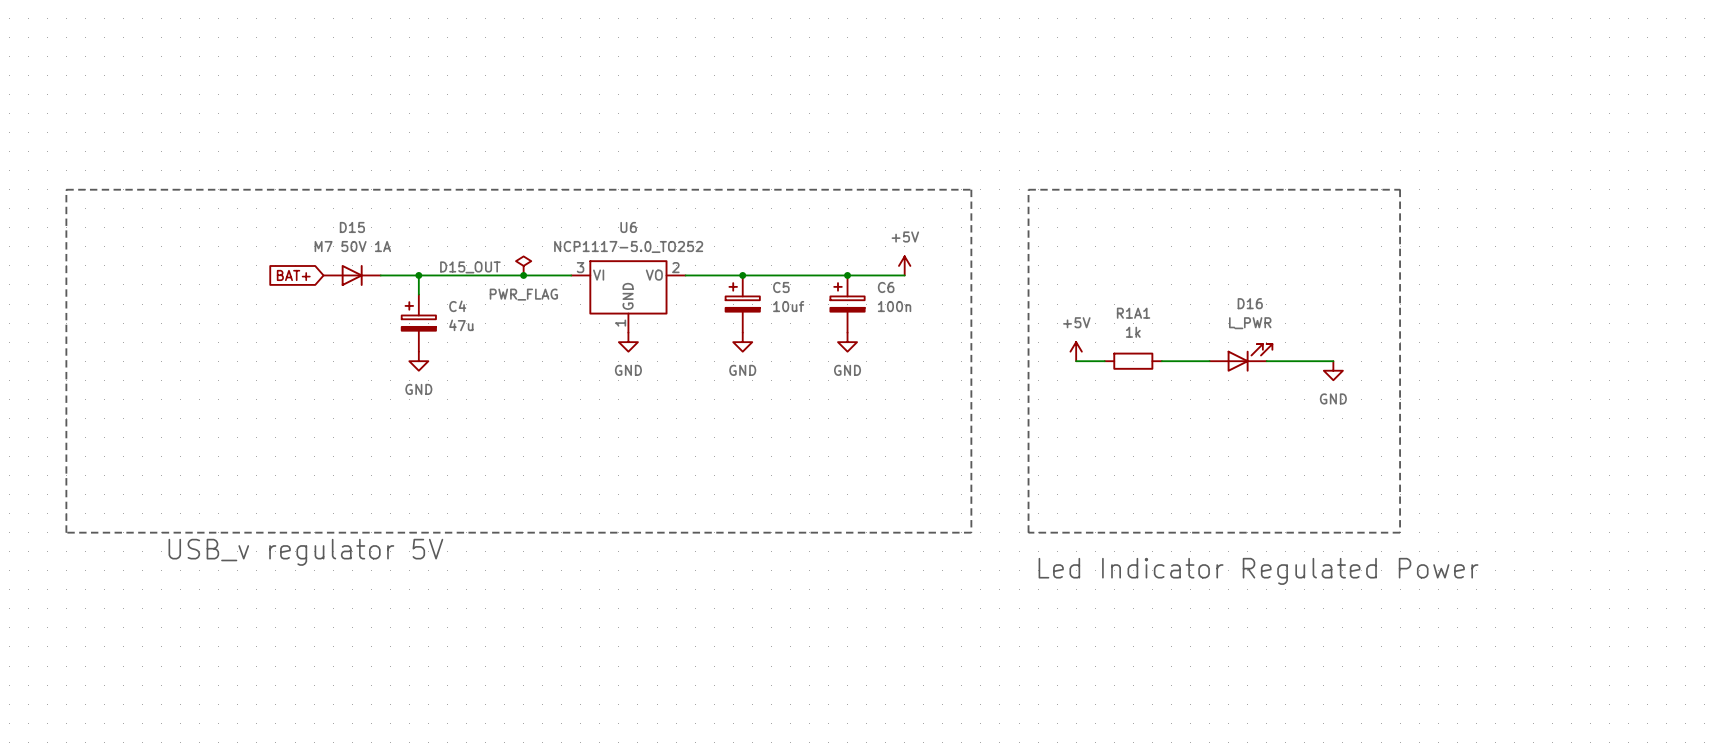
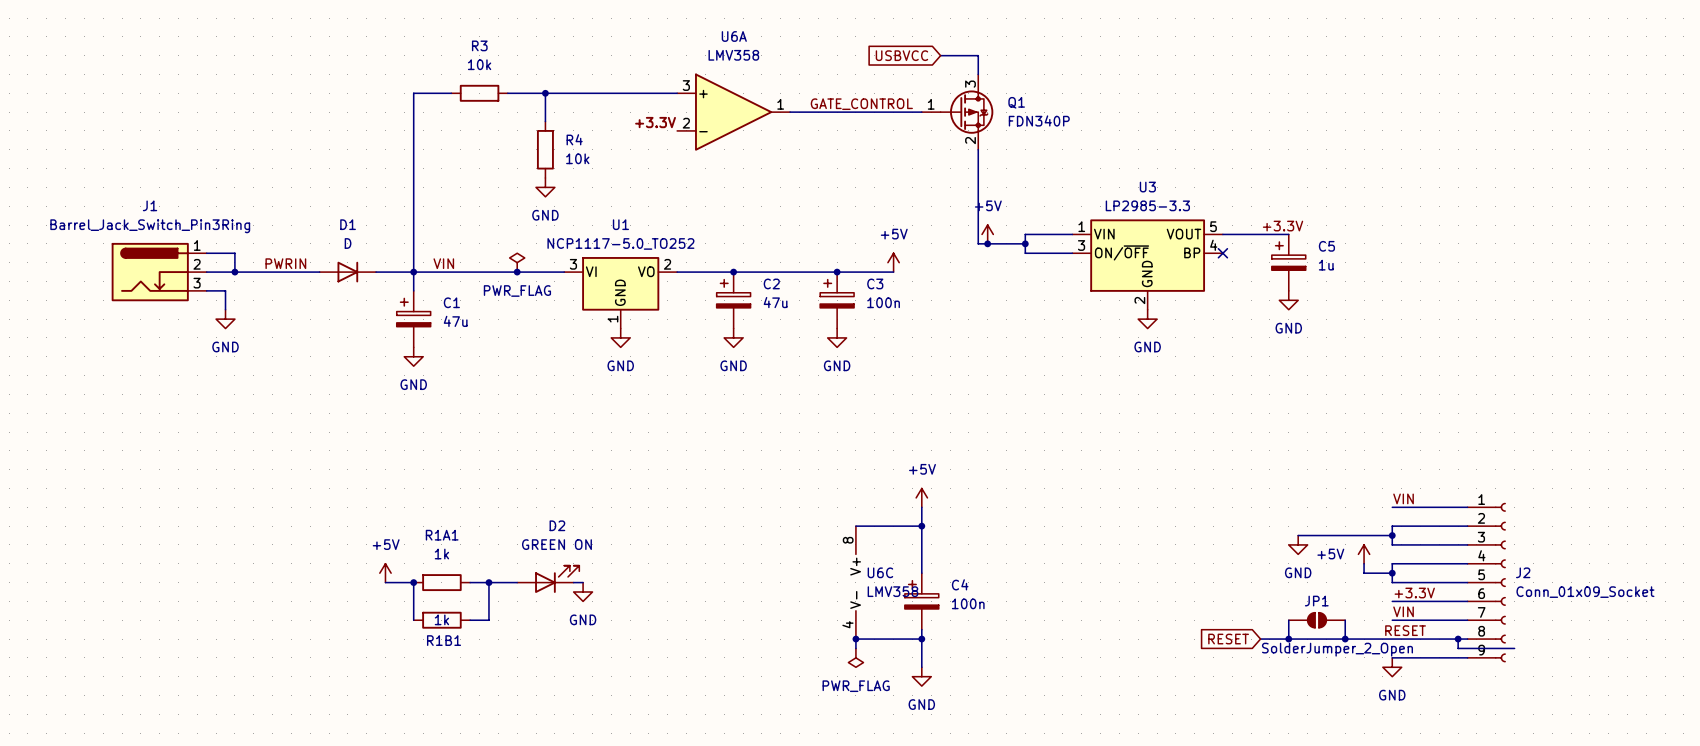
global label: none -> USBVCC (901, 55)
wire: none -> (940, 55) (978, 55) (978, 74)
wire: none -> (451, 93) (413, 93) (413, 272)
R3: none -> 10k (479, 93)
wire: none -> (507, 93) (677, 93)
wire: none -> (545, 93) (545, 121)
junction: none -> (545, 93)
label: none -> GATE_CONTROL (861, 104)
U6A: none -> LMV358 (733, 112)
wire: none -> (790, 112) (921, 112)
Q1: none -> FDN340P (957, 112)
label: none -> +3.3V (655, 122)
R4: none -> 10k (545, 149)
wire: none -> (978, 149) (978, 243) (1025, 243)
line: (66, 189) (971, 189) (971, 532) (66, 532) (66, 189) -> none
power symbol: none -> GND (545, 187)
line: (1028, 189) (1400, 189) (1400, 532) (1028, 532) (1028, 189) -> none
D15 name: D15 (352, 227) -> D1 (348, 224)
U6 name: U6 (628, 227) -> U1 (620, 224)
label: none -> +3.3V (1283, 226)
power symbol: none -> +5V (987, 234)
wire: none -> (1072, 234) (1025, 234) (1025, 253) (1072, 253)
D15 value: M7 50V 1A (352, 246) -> D (348, 243)
junction: none -> (987, 243)
junction: none -> (1025, 243)
wire: none -> (206, 253) (234, 253) (234, 272)
no-connect mark: none -> (1222, 253)
C5: none -> 1u (1288, 262)
label: none -> PWRIN (285, 263)
label: D15_OUT (470, 267) -> VIN (443, 263)
U3: none -> LP2985-3.3 (1147, 264)
J1: none -> Barrel_Jack_Switch_Pin3Ring (159, 272)
wire: none -> (206, 272) (319, 272)
junction: none -> (234, 272)
global label: BAT+ (293, 275) -> none
C5 name: C5 (781, 287) -> C2 (771, 283)
C6 name: C6 (886, 287) -> C3 (875, 283)
wire: none -> (206, 290) (225, 290) (225, 309)
C4 name: C4 (457, 306) -> C1 (451, 302)
C5 value: 10uf (788, 306) -> 47u (775, 302)
power symbol: none -> GND (225, 319)
power symbol: none -> GND (1147, 319)
power symbol: +5V (1076, 351) -> none
D16: L_PWR (1240, 357) -> none
wire: (1076, 361) (1104, 361) -> none
R1A1 position: (1133, 361) -> (441, 582)
wire: (1161, 361) (1209, 361) -> none
wire: (1266, 361) (1333, 361) -> (1222, 234) (1288, 234)
power symbol position: GND (1333, 370) -> GND (1288, 300)
power symbol: none -> +5V (921, 497)
label: none -> VIN (1403, 498)
wire: none -> (921, 507) (921, 573)
wire: none -> (1392, 507) (1467, 507)
junction: none -> (921, 526)
wire: none -> (1467, 526) (1392, 526) (1392, 544) (1467, 544)
wire: none -> (1298, 535) (1392, 535)
junction: none -> (1392, 535)
power symbol: none -> GND (1298, 544)
text: USB_v regulator 5V (305, 552) -> none
power symbol: none -> +5V (1364, 554)
wire: none -> (1364, 563) (1364, 573) (1392, 573)
wire: none -> (1467, 563) (1392, 563) (1392, 582) (1467, 582)
text: Led Indicator Regulated Power (1258, 571) -> none
power symbol: none -> +5V (385, 573)
junction: none -> (1392, 573)
D2: none -> GREEN ON (548, 579)
wire: none -> (385, 582) (413, 582) (413, 620)
junction: none -> (413, 582)
wire: none -> (470, 582) (517, 582)
wire: none -> (488, 582) (488, 620) (470, 620)
junction: none -> (488, 582)
wire: none -> (573, 582) (583, 582)
U6C: none -> LMV358 (855, 582)
J2: none -> Conn_01x09_Socket (1486, 582)
power symbol: none -> GND (583, 592)
label: none -> +3.3V (1414, 593)
C4: none -> 100n (921, 601)
wire: none -> (1392, 601) (1467, 601)
label: none -> VIN (1403, 611)
R1B1: none -> 1k (441, 620)
wire: none -> (1288, 620) (1288, 639)
JP1: none -> SolderJumper_2_Open (1317, 620)
wire: none -> (1345, 620) (1345, 639)
wire: none -> (1392, 620) (1467, 620)
wire: none -> (921, 629) (921, 667)
label: none -> RESET (1405, 630)
junction: none -> (855, 639)
wire: none -> (921, 639) (855, 639) (855, 648)
junction: none -> (921, 639)
global label: none -> RESET (1228, 639)
wire: none -> (1260, 639) (1467, 639)
junction: none -> (1288, 639)
junction: none -> (1345, 639)
wire: none -> (1458, 639) (1458, 648) (1514, 648)
junction: none -> (1458, 639)
power symbol: none -> PWR_FLAG (855, 657)
wire: none -> (1392, 657) (1467, 657)
power symbol: none -> GND (1392, 667)
power symbol: none -> GND (921, 676)

